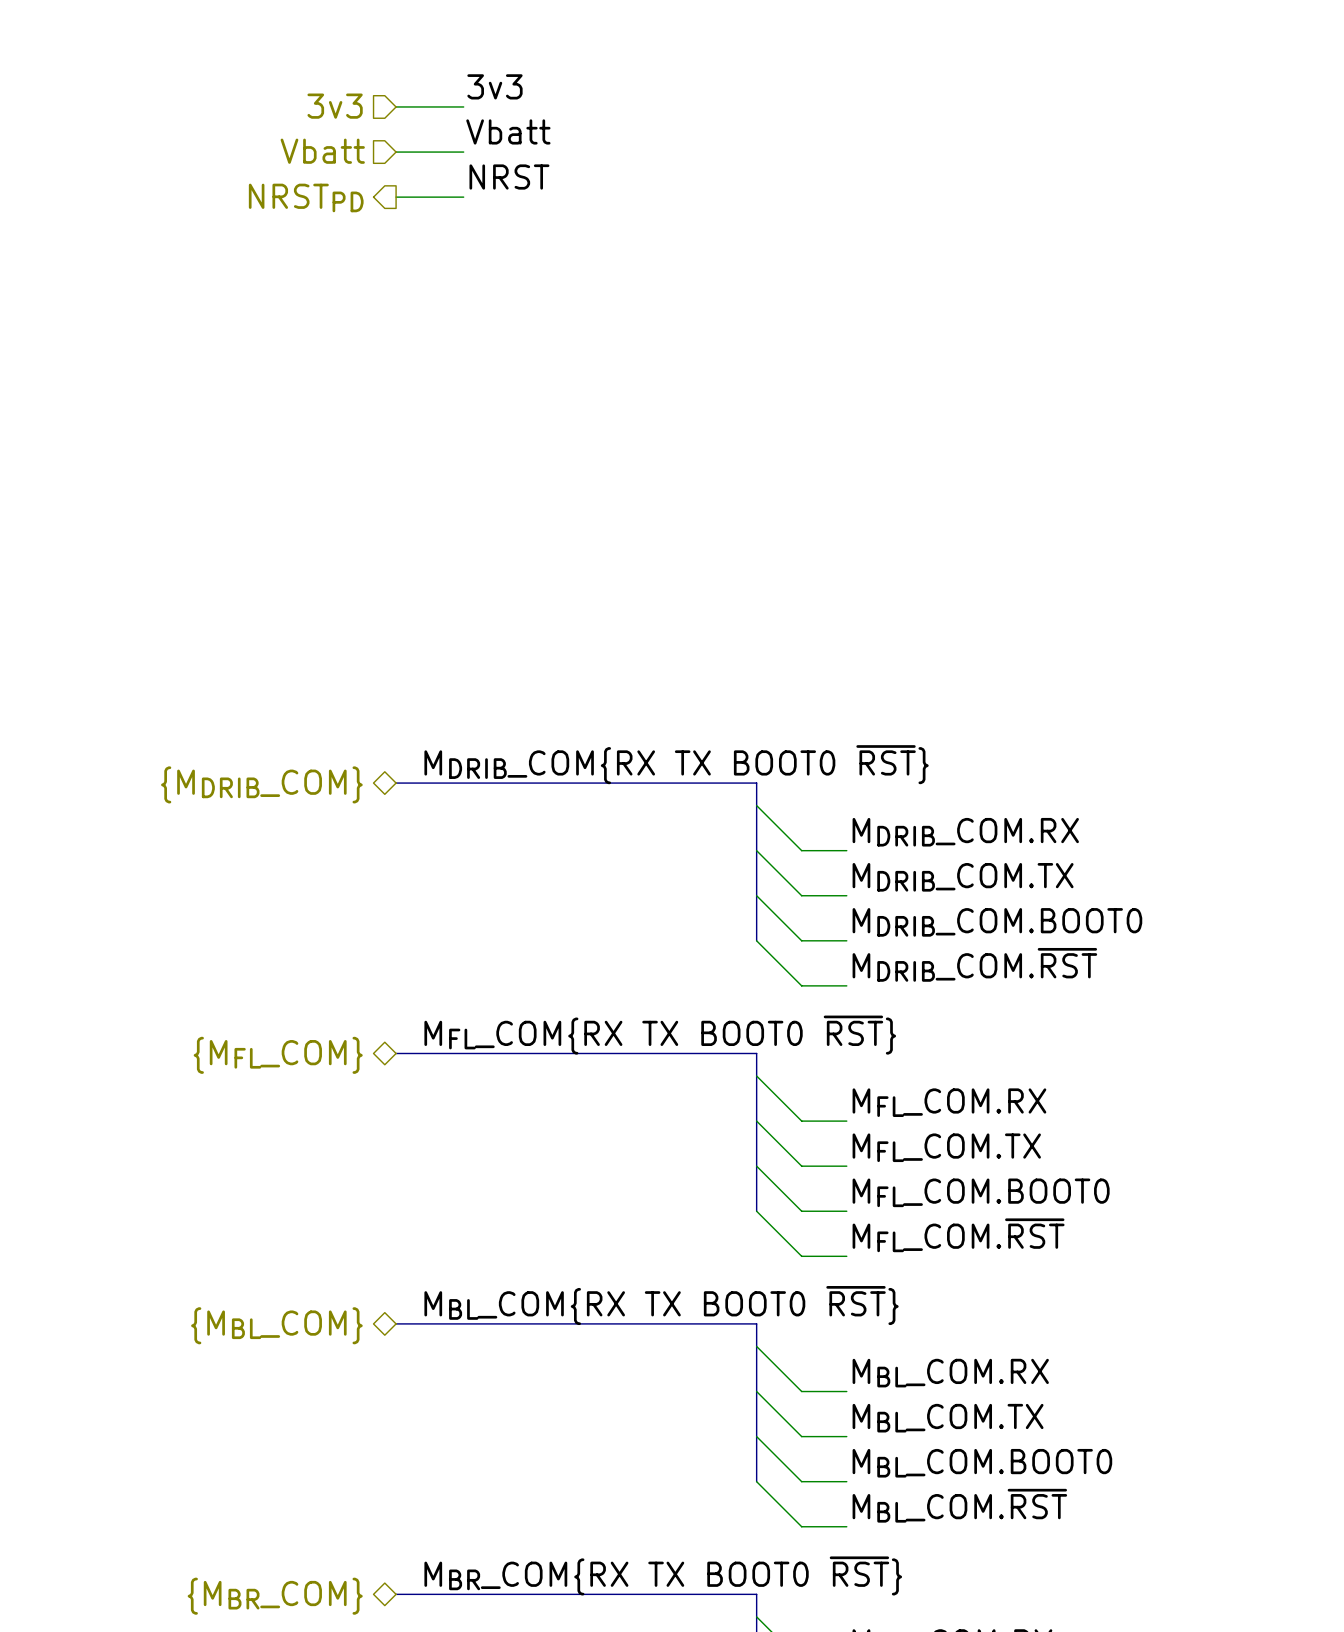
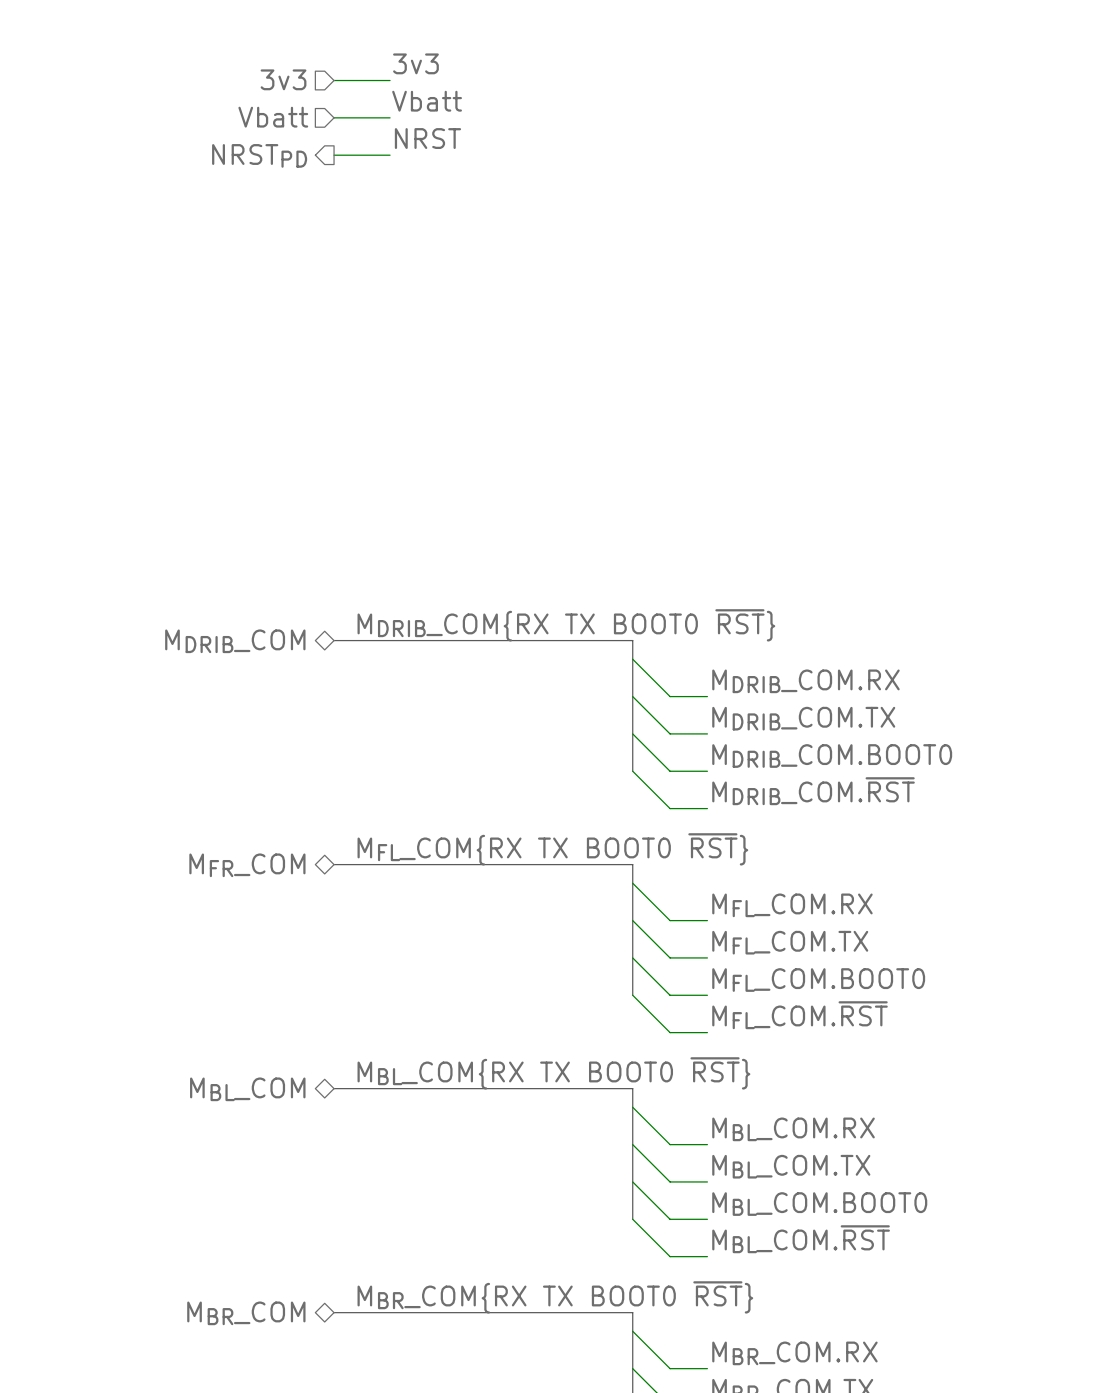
hierarchical label: {MDRIB_COM} (261, 784) -> MDRIB_COM (235, 641)
hierarchical label: {MFL_COM} (278, 1055) -> MFR_COM (247, 865)
hierarchical label: {MBL_COM} (276, 1325) -> MBL_COM (247, 1089)
hierarchical label: {MBR_COM} (275, 1596) -> MBR_COM (246, 1313)

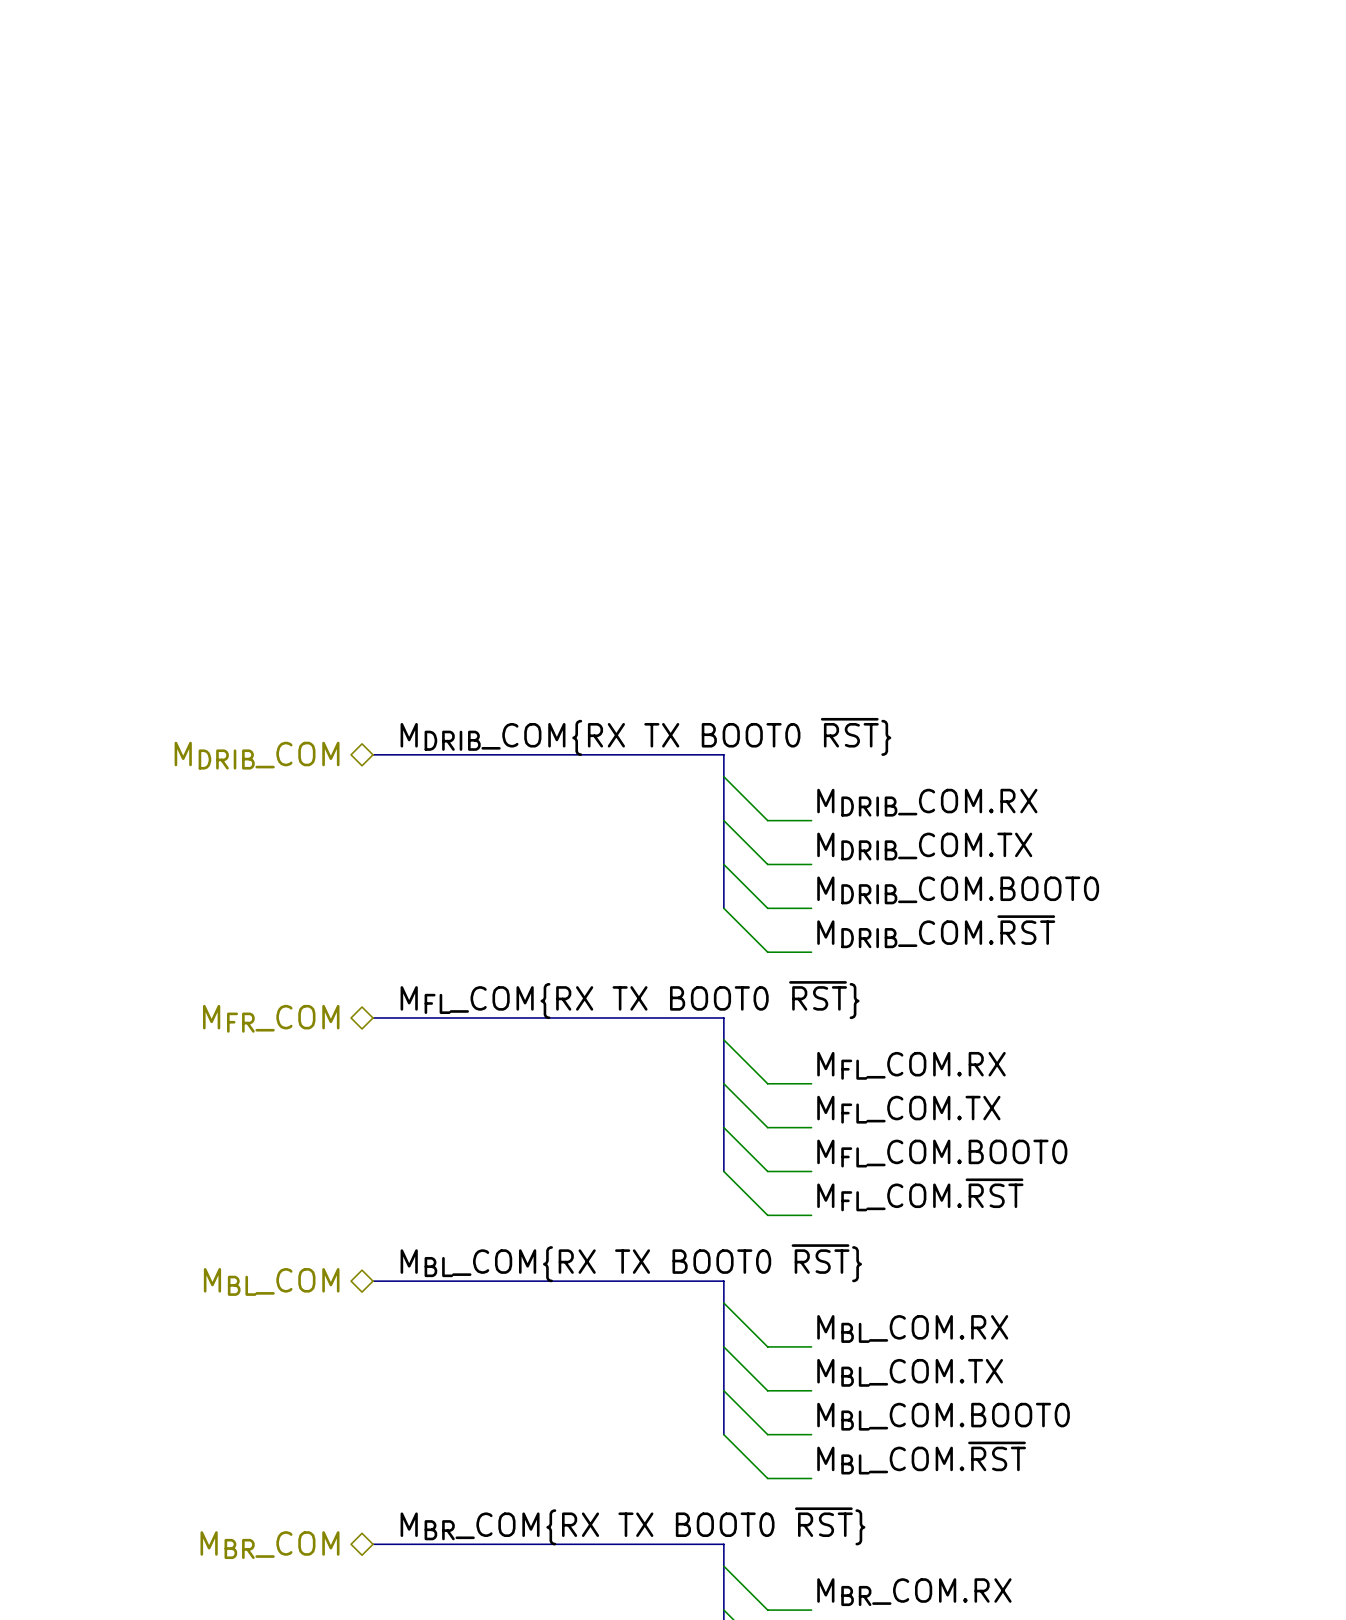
label: 3v3 (415, 63) -> none
hierarchical label: 3v3 (283, 79) -> none
wire: (334, 80) (390, 80) -> none
label: Vbatt (427, 101) -> none
hierarchical label: Vbatt (273, 117) -> none
wire: (334, 117) (390, 117) -> none
label: NRST (427, 138) -> none
hierarchical label: NRSTPD (259, 155) -> none
wire: (334, 155) (390, 155) -> none

